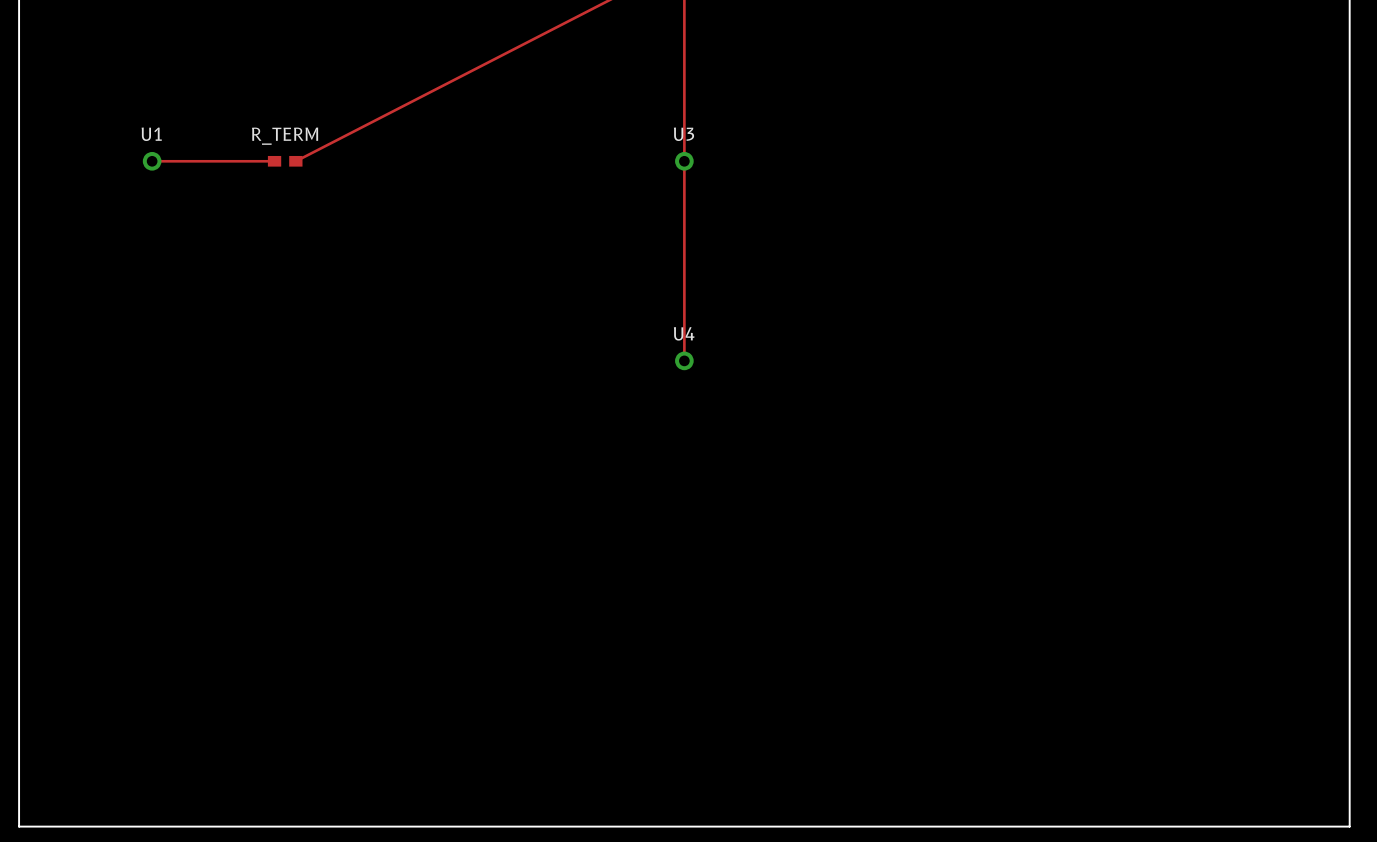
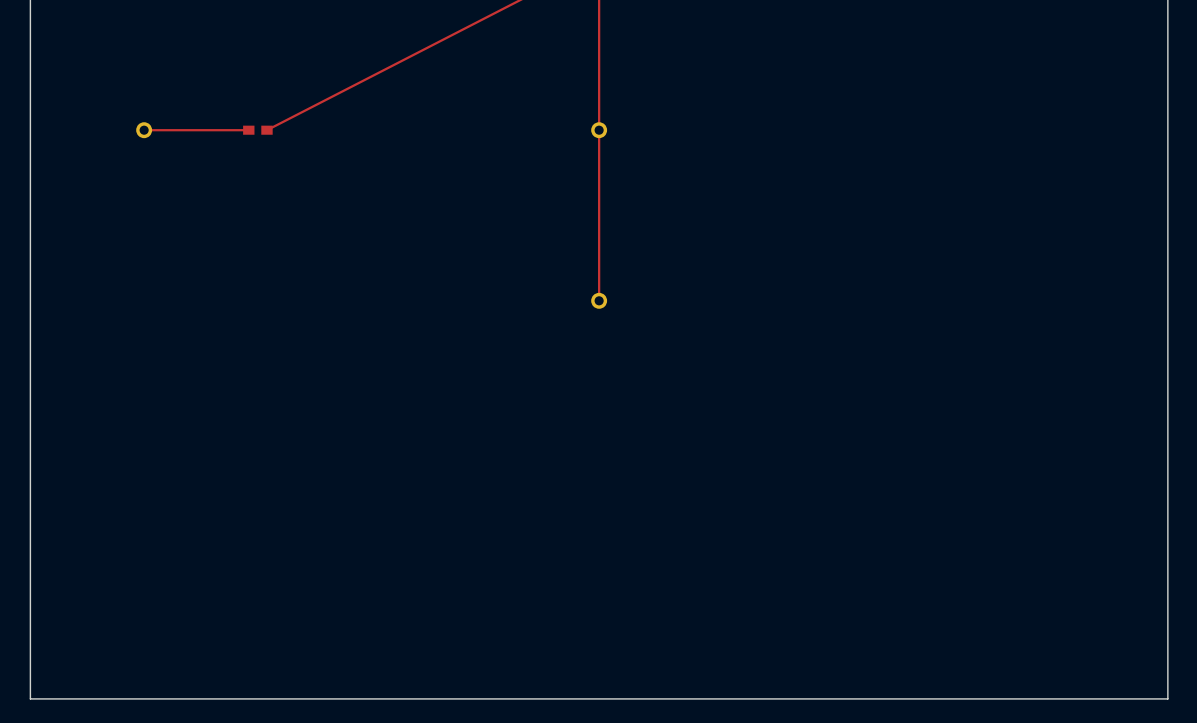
U1 name: U1 (151, 134) -> none
U3 name: U3 (683, 134) -> none
R_TERM name: R_TERM (285, 136) -> none
U4 name: U4 (684, 333) -> none

